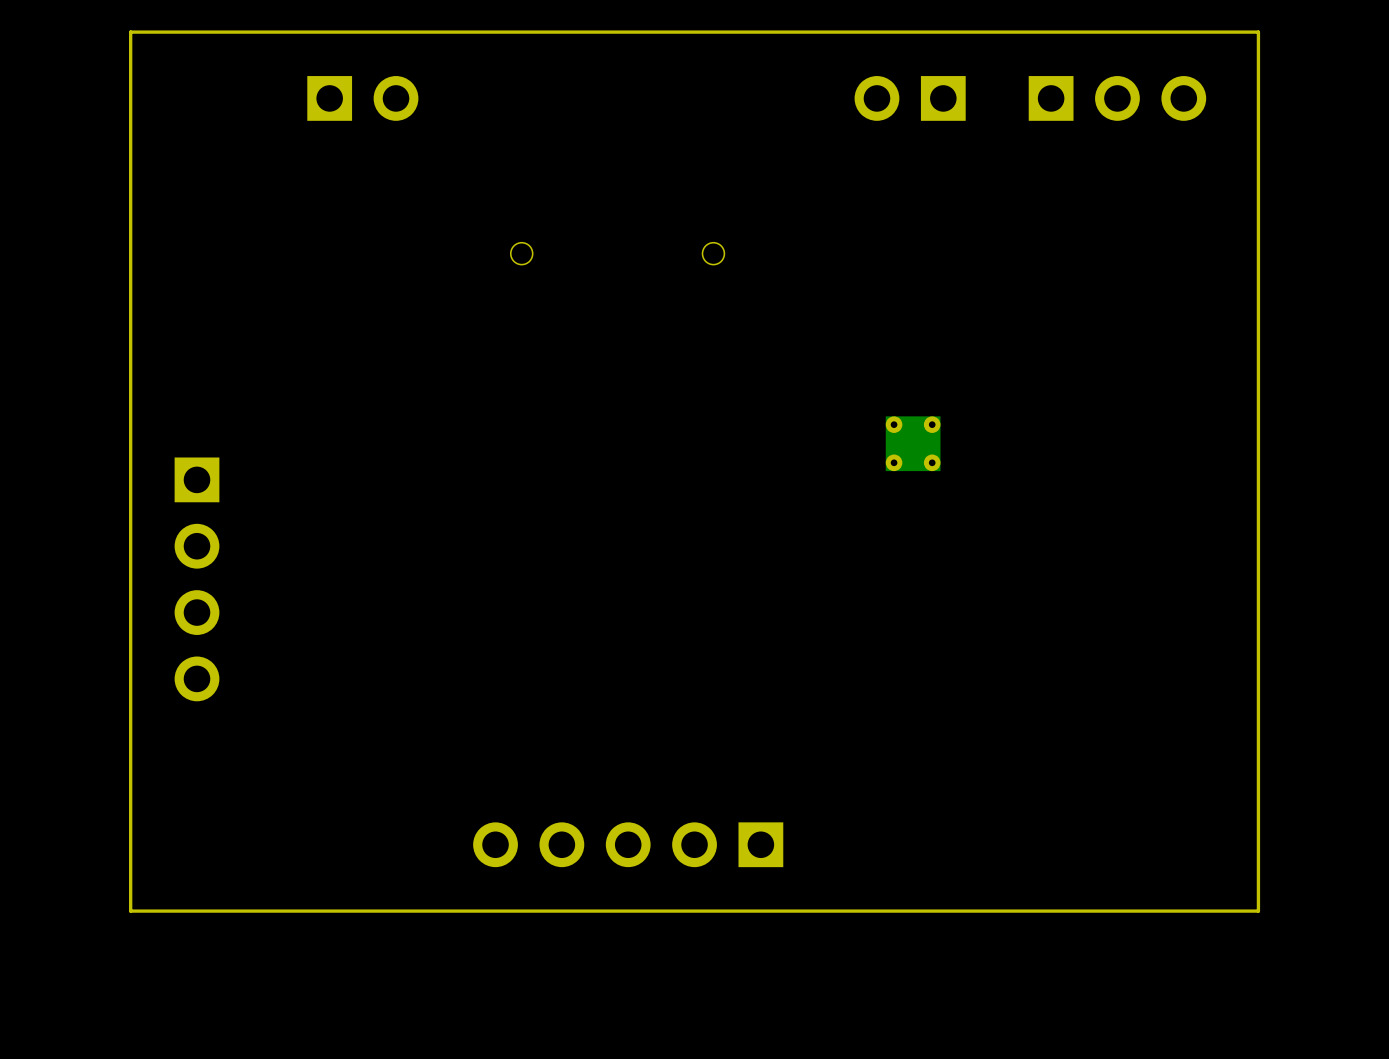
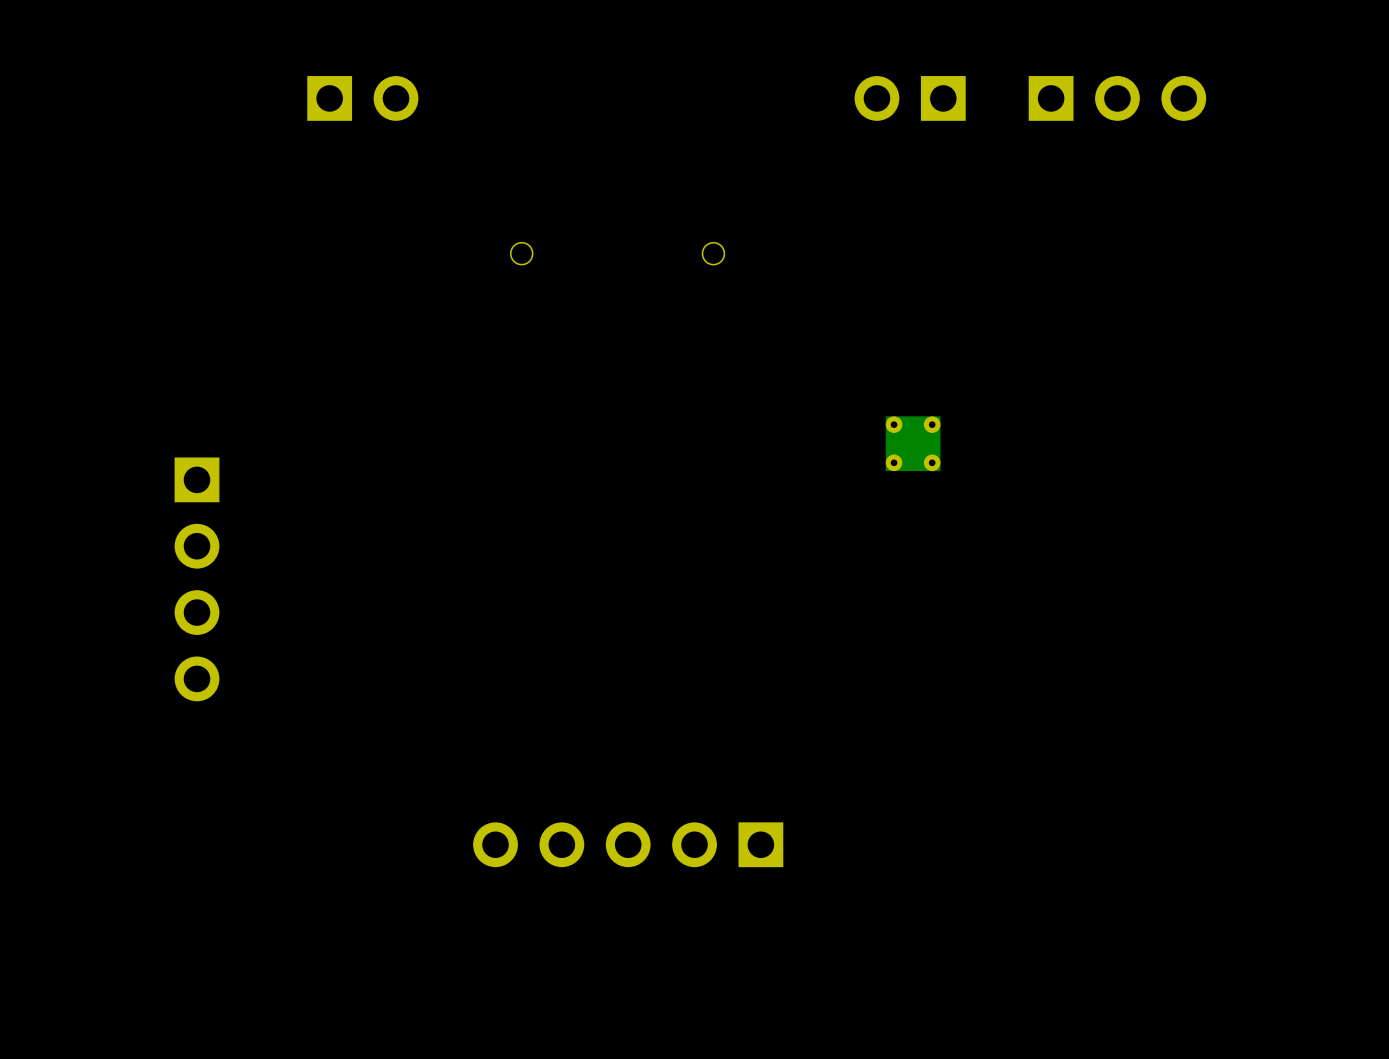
board edge: (1258, 32) (130, 32) (130, 911) (1258, 911) (1258, 32) -> none

